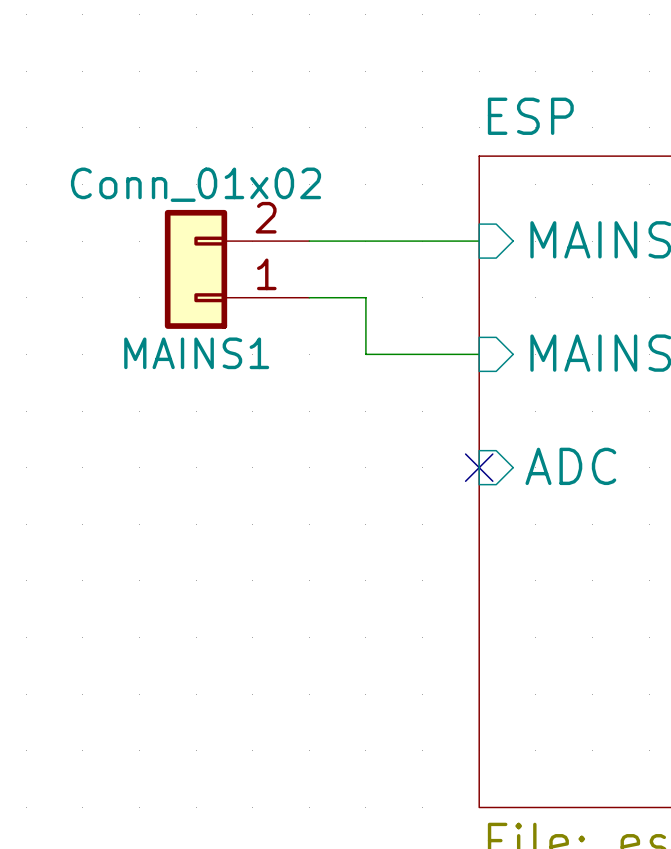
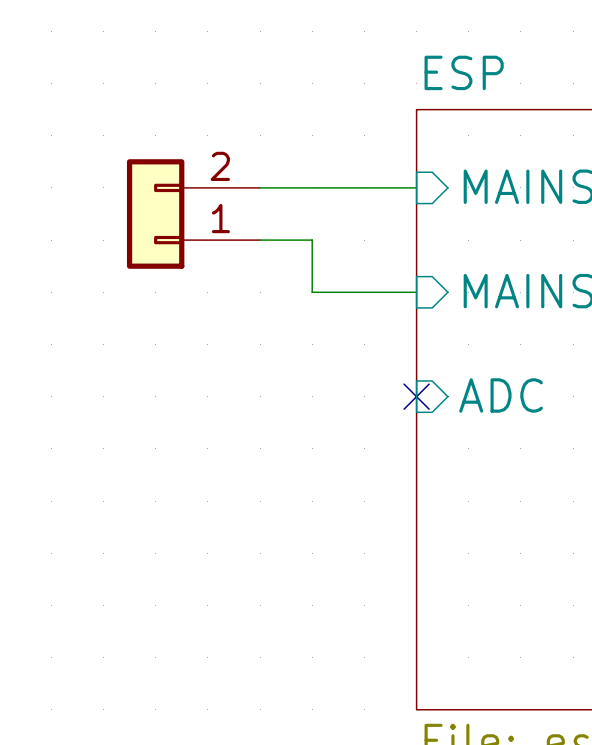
MAINS1 value: Conn_01x02 (196, 184) -> none
MAINS1 name: MAINS1 (196, 353) -> none

